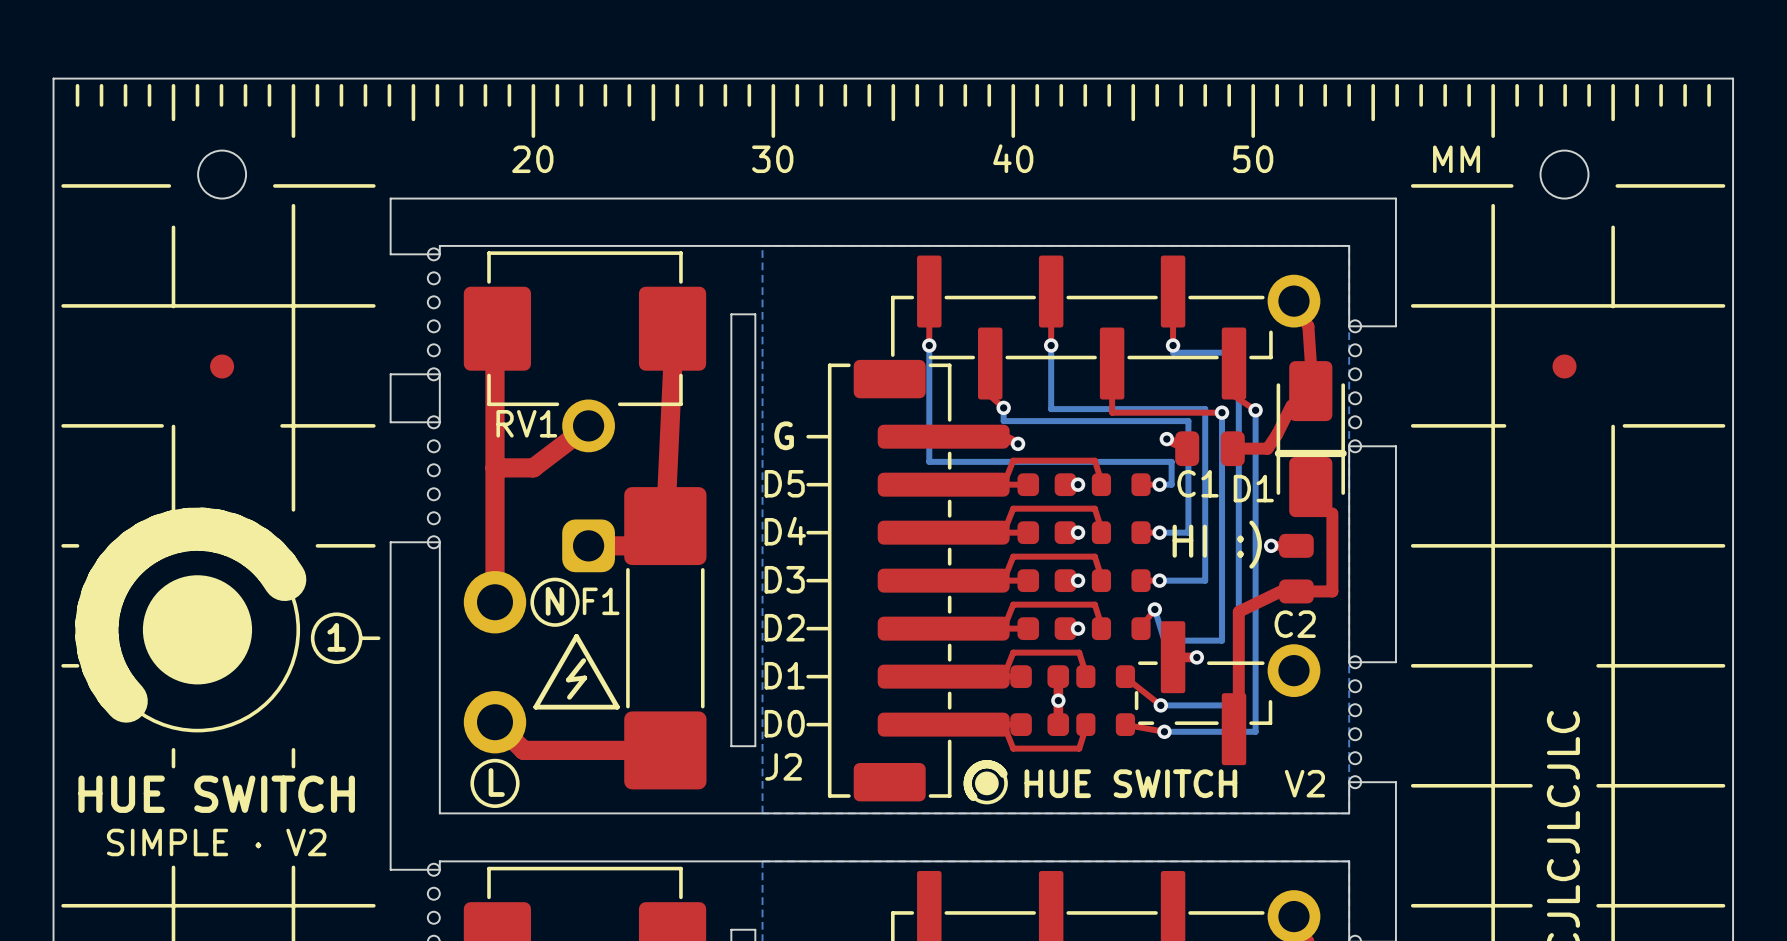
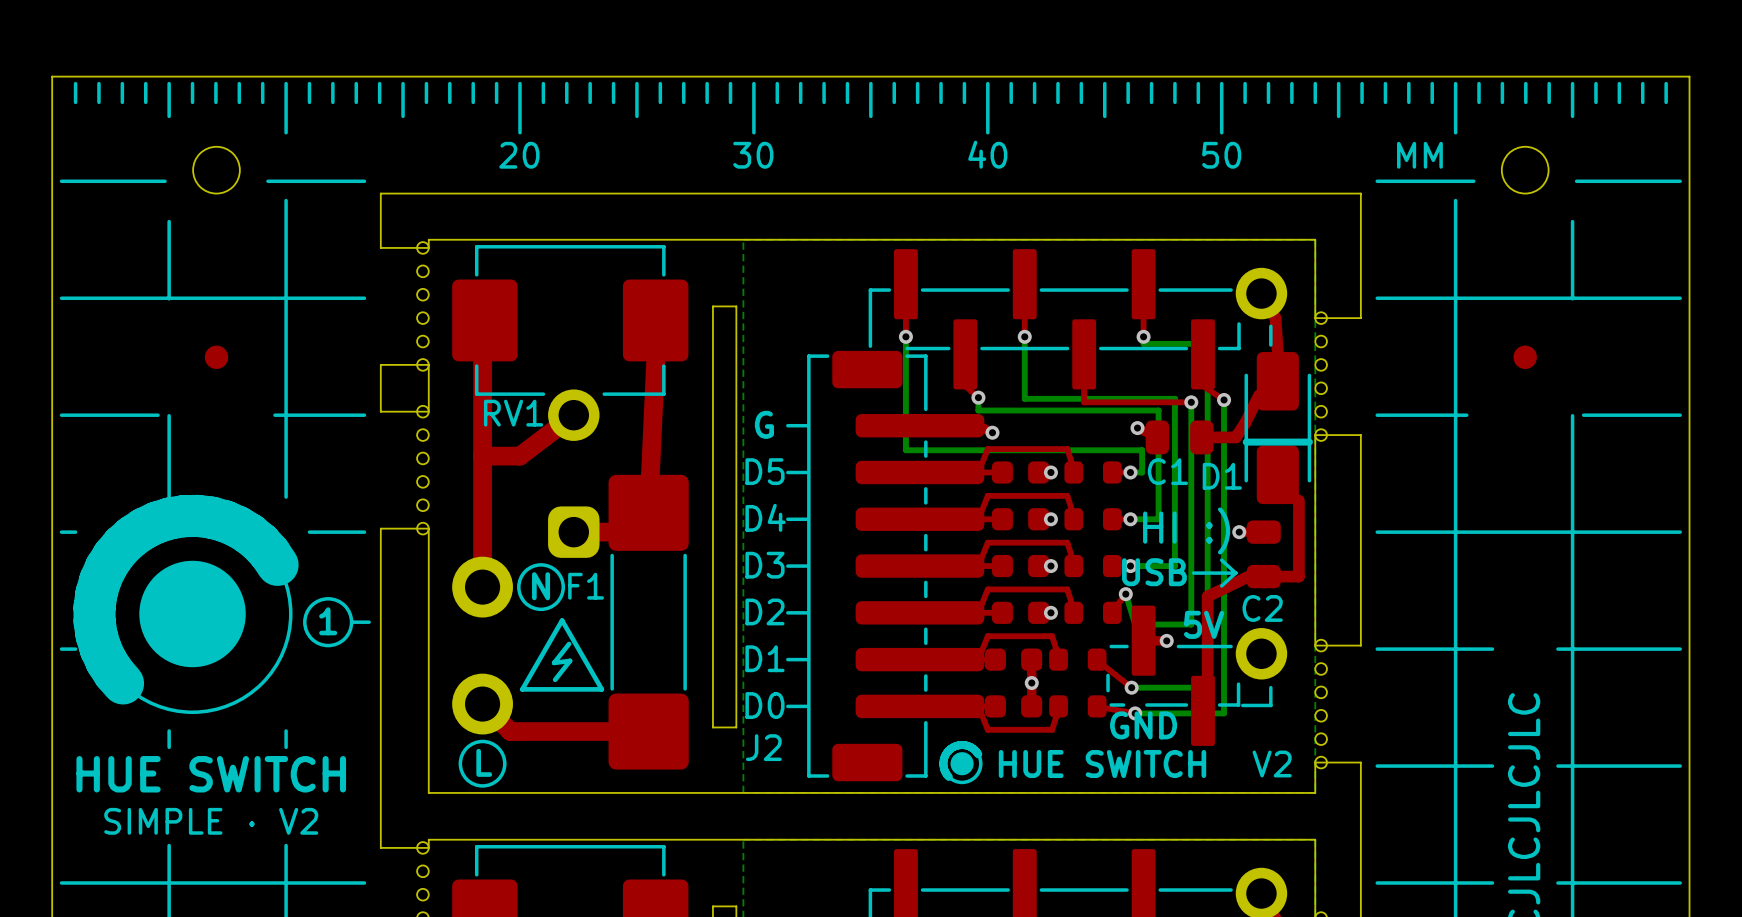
line: none -> (1270, 326) (1270, 345)
line: none -> (1221, 560) (1235, 573)
text: none -> USB (1154, 572)
line: none -> (1193, 573) (1235, 573)
line: none -> (1235, 573) (1221, 585)
text: none -> 5V (1204, 624)
line: none -> (1270, 687) (1270, 705) (1242, 705)
text: none -> GND (1143, 725)

